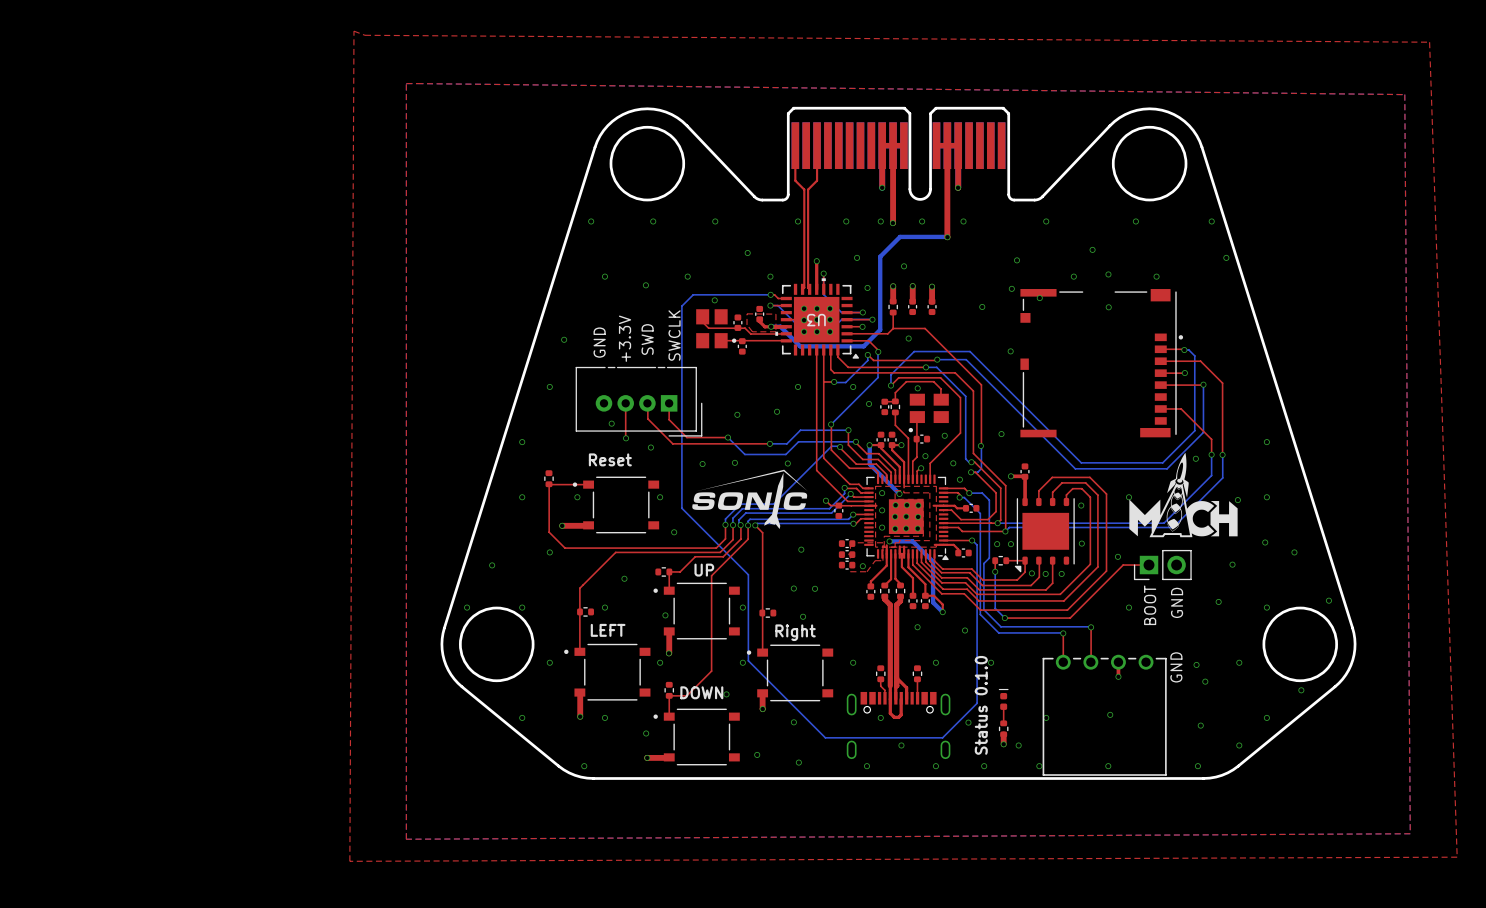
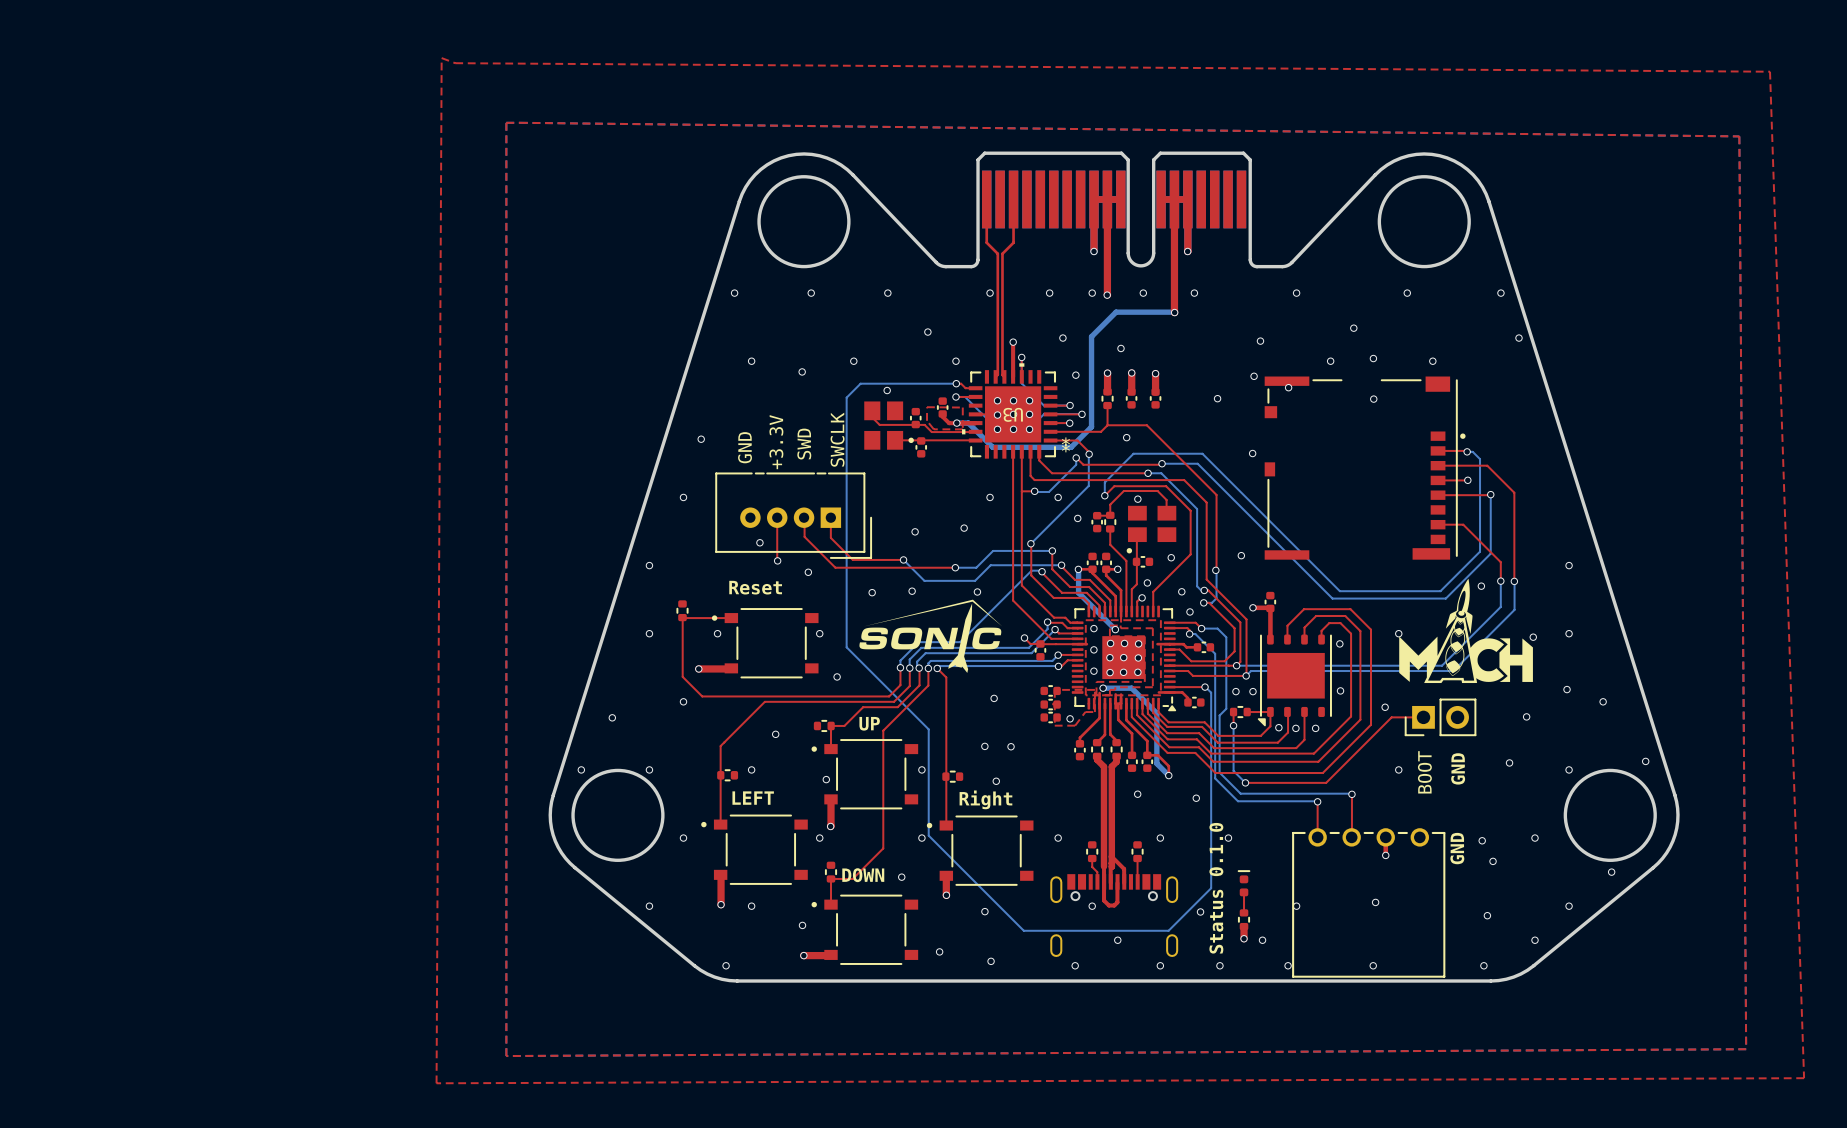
U3 footprint: [775, 278, 860, 359] -> [962, 363, 1058, 459]

